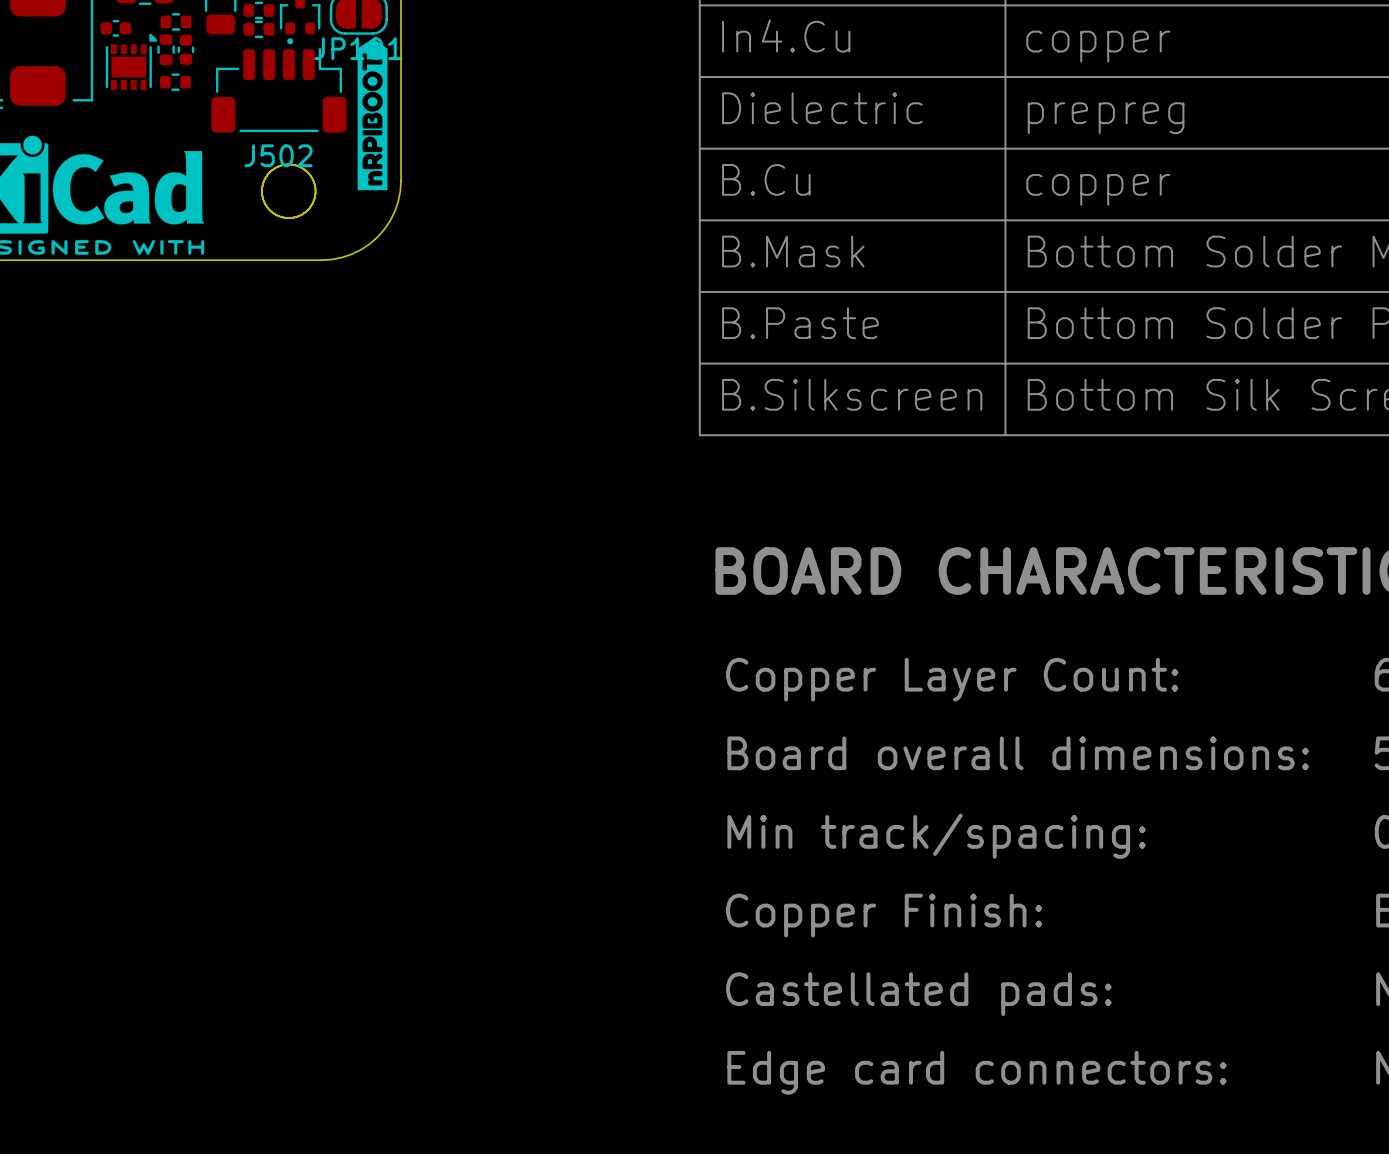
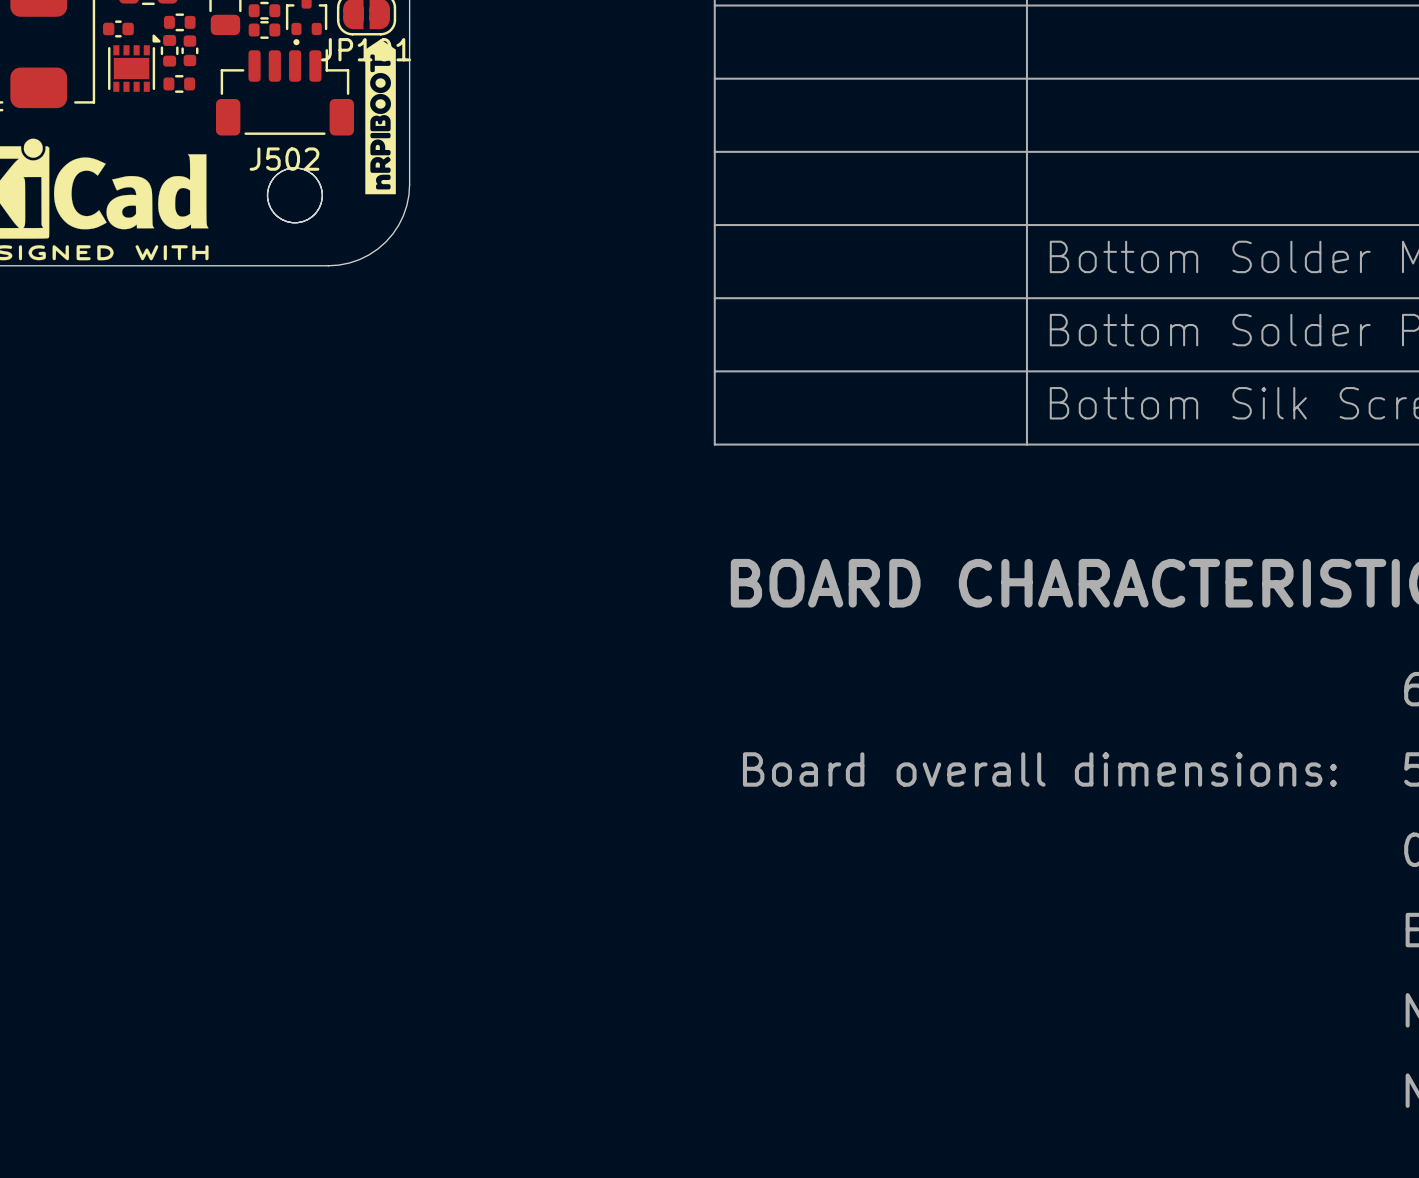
text: In4.Cu (786, 35) -> none
text: copper (1098, 46) -> none
text: Dielectric (822, 108) -> none
text: prepreg (1106, 118) -> none
text: B.Cu (766, 179) -> none
text: copper (1098, 189) -> none
text: B.Mask (793, 251) -> none
text: B.Paste (800, 323) -> none
text: B.Silkscreen (852, 394) -> none
text: Copper Layer Count: (952, 679) -> none
text: Min track/spacing: (936, 836) -> none
text: Copper Finish: (884, 915) -> none
text: Castellated pads: (918, 994) -> none
text: Edge card connectors: (976, 1072) -> none

